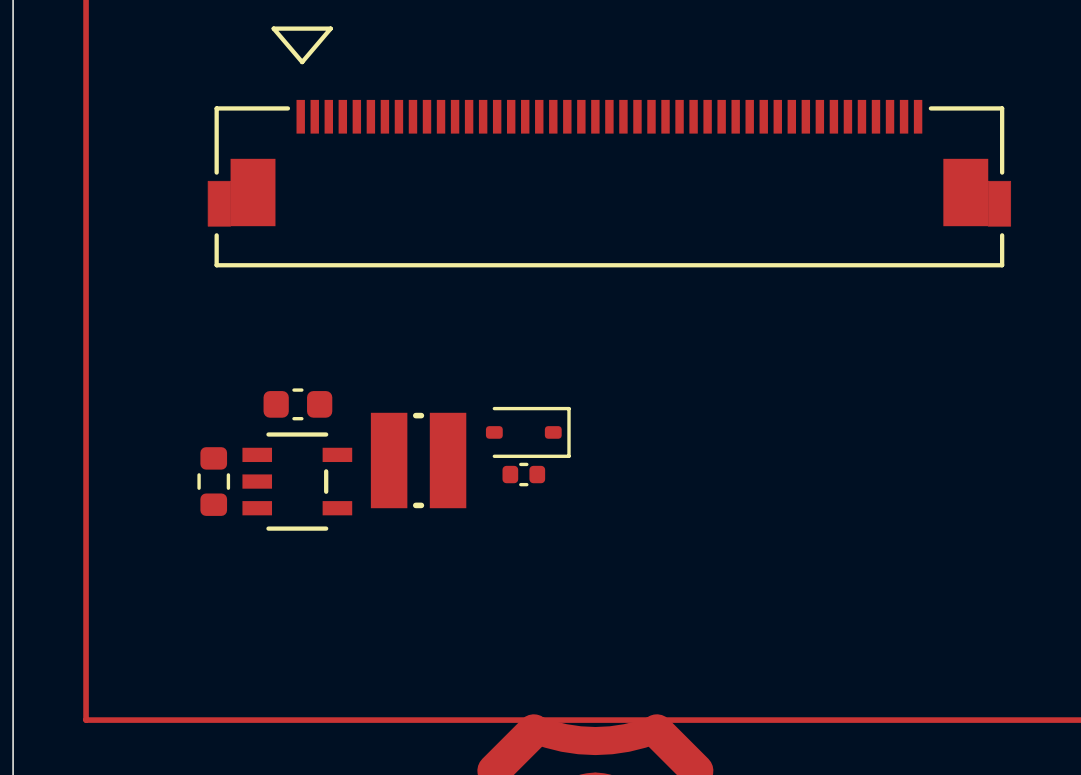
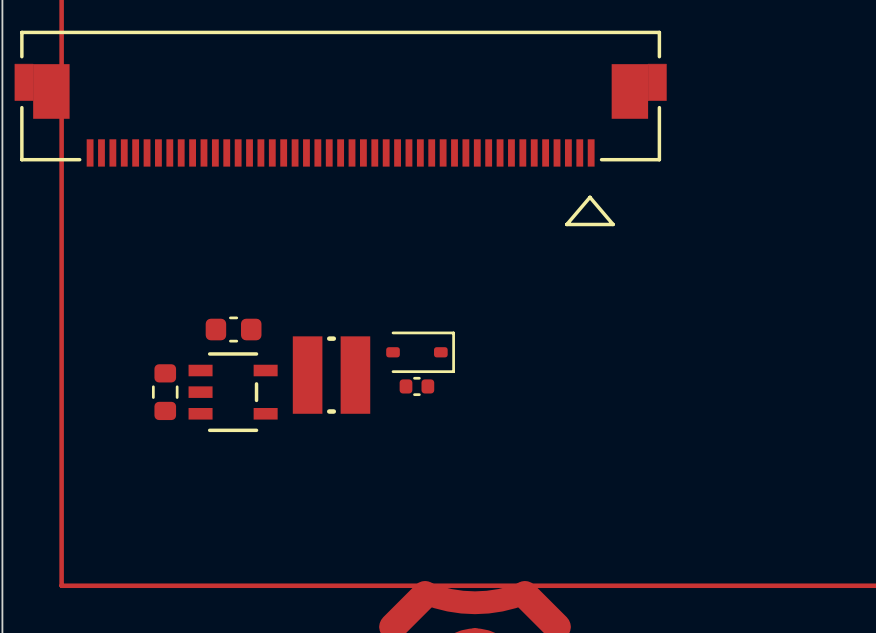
part rotation: 0° (609, 146) -> 180° (340, 128)

